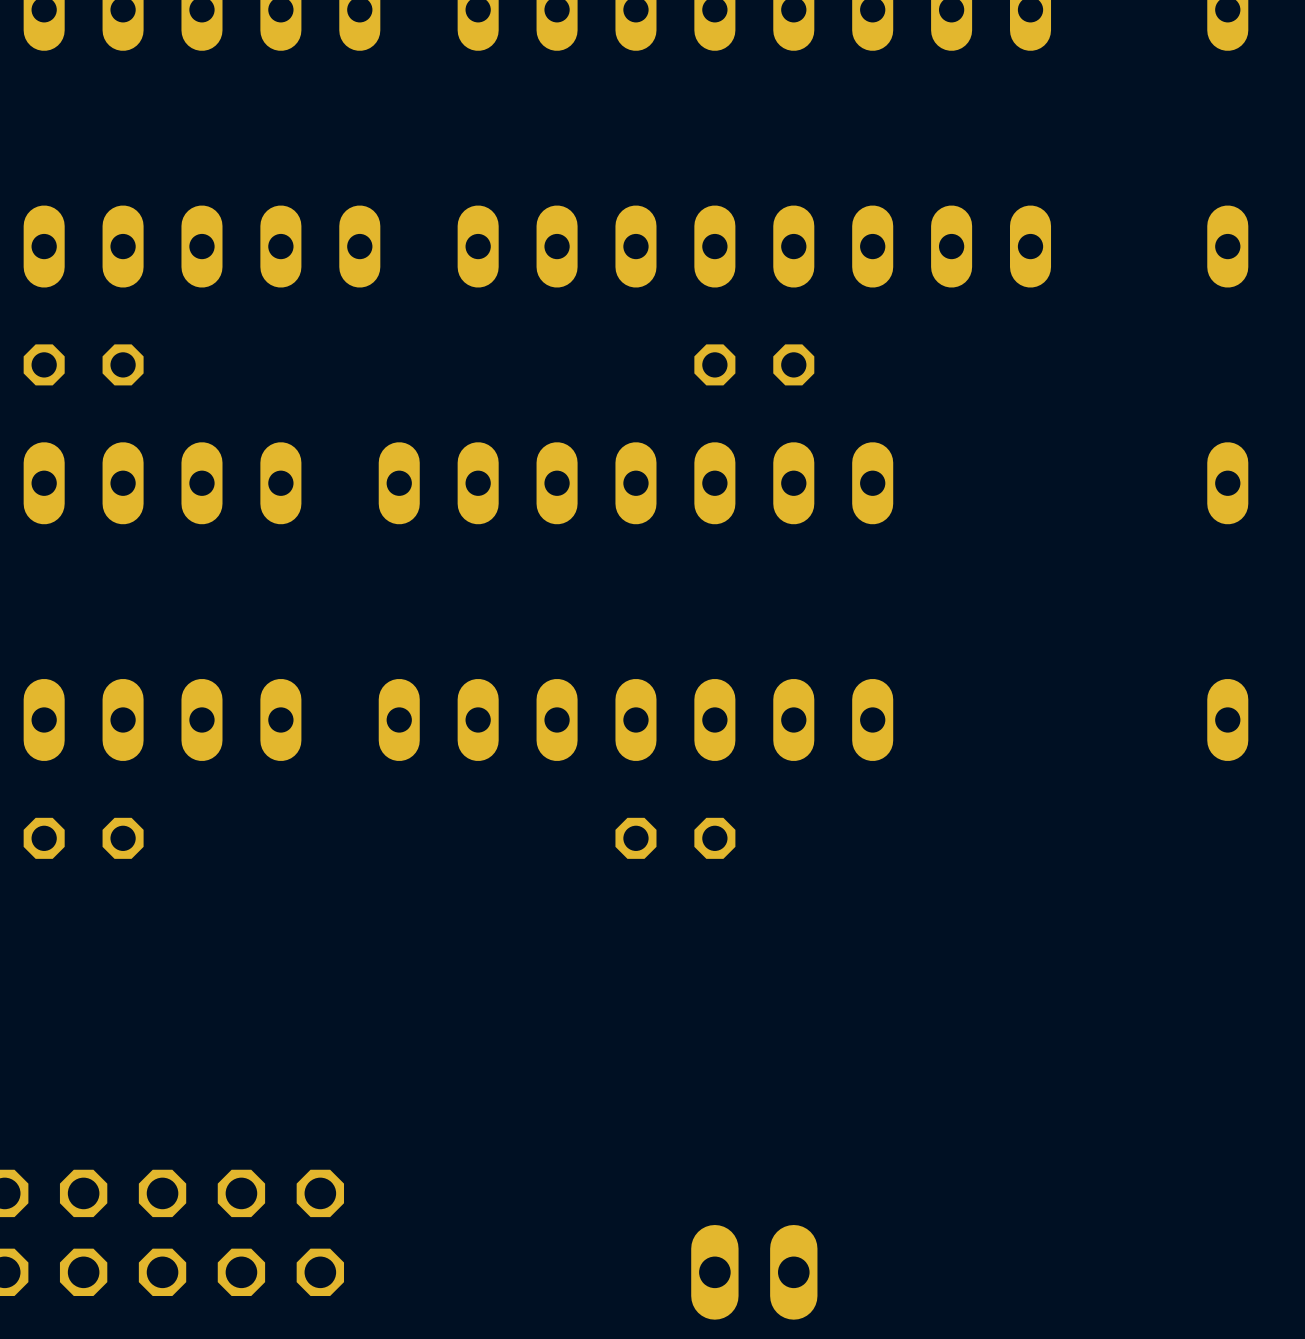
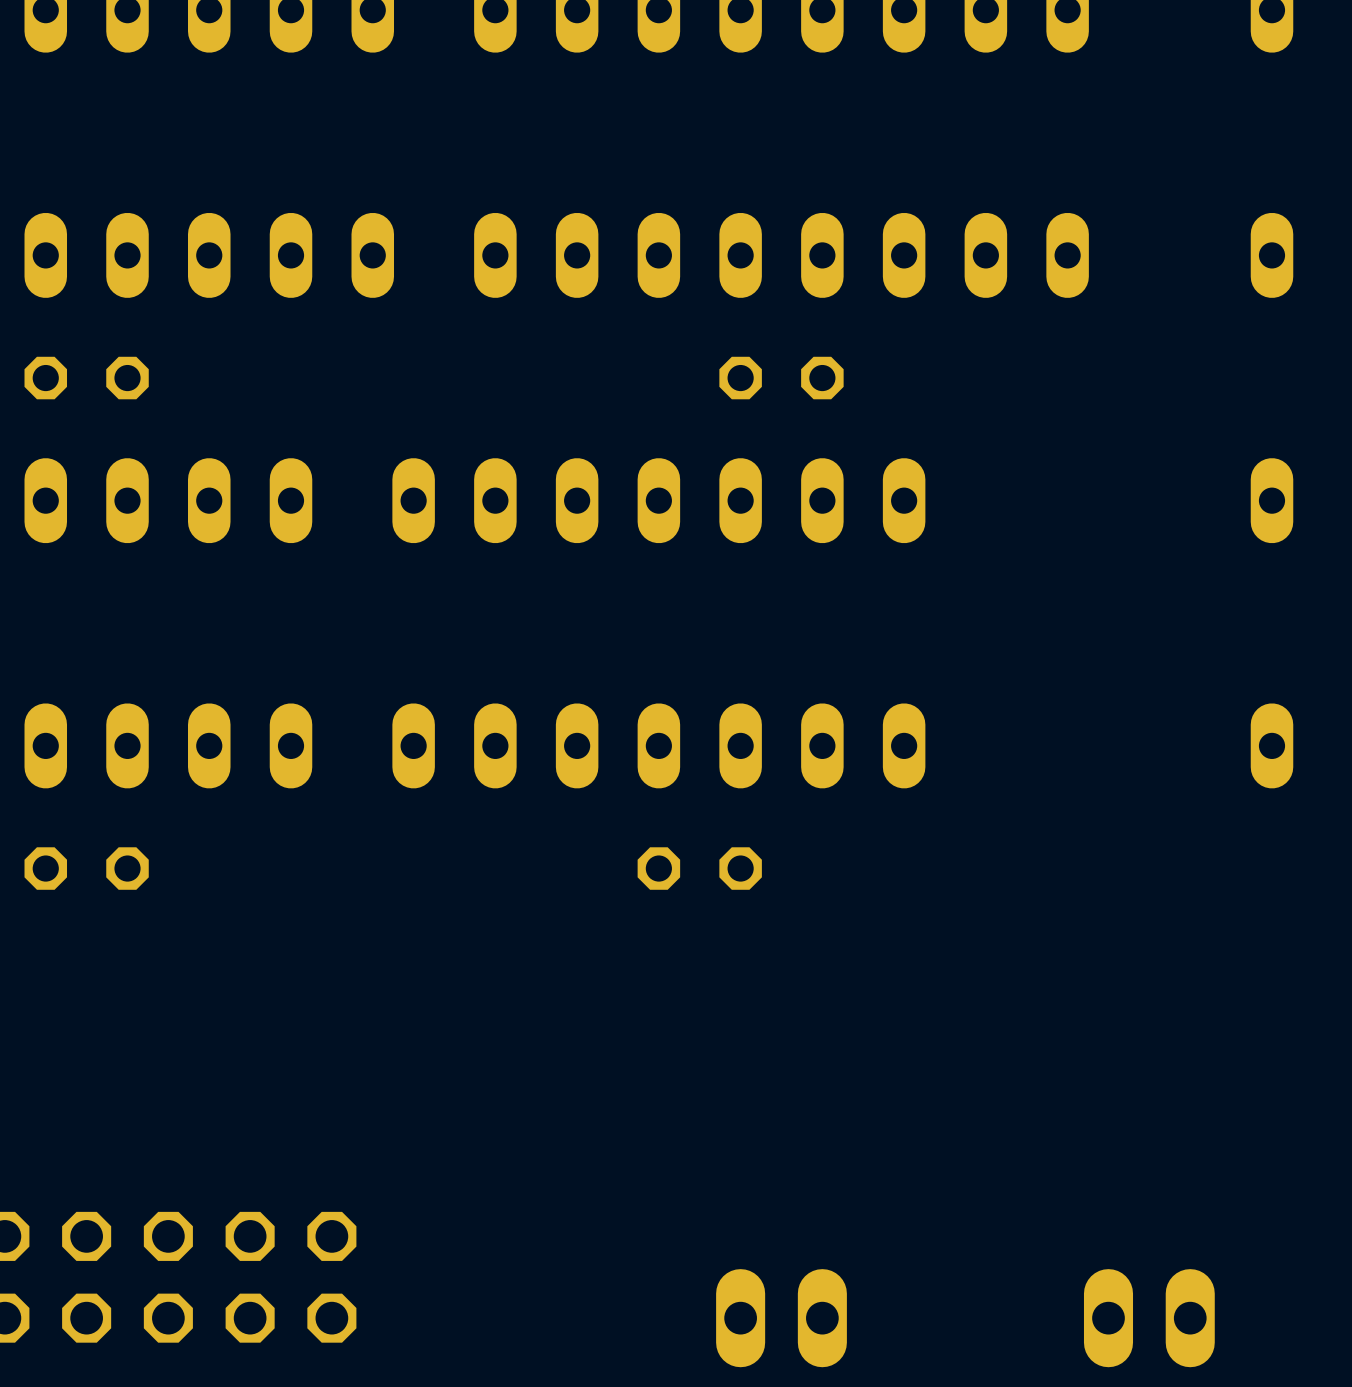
part: none -> (1149, 1318)

